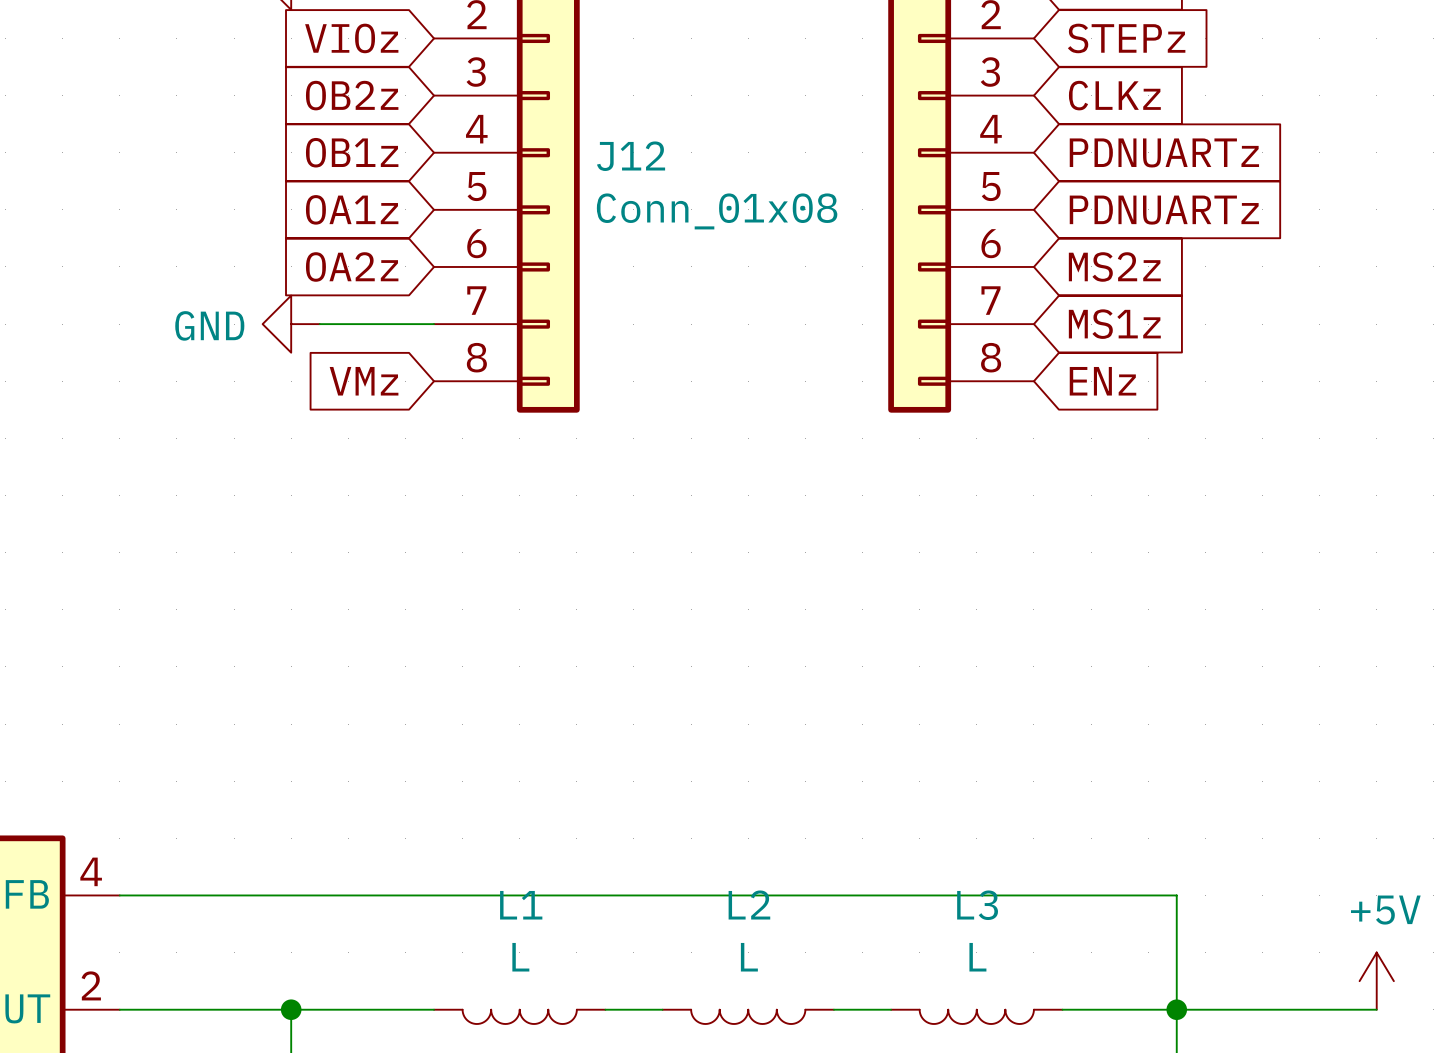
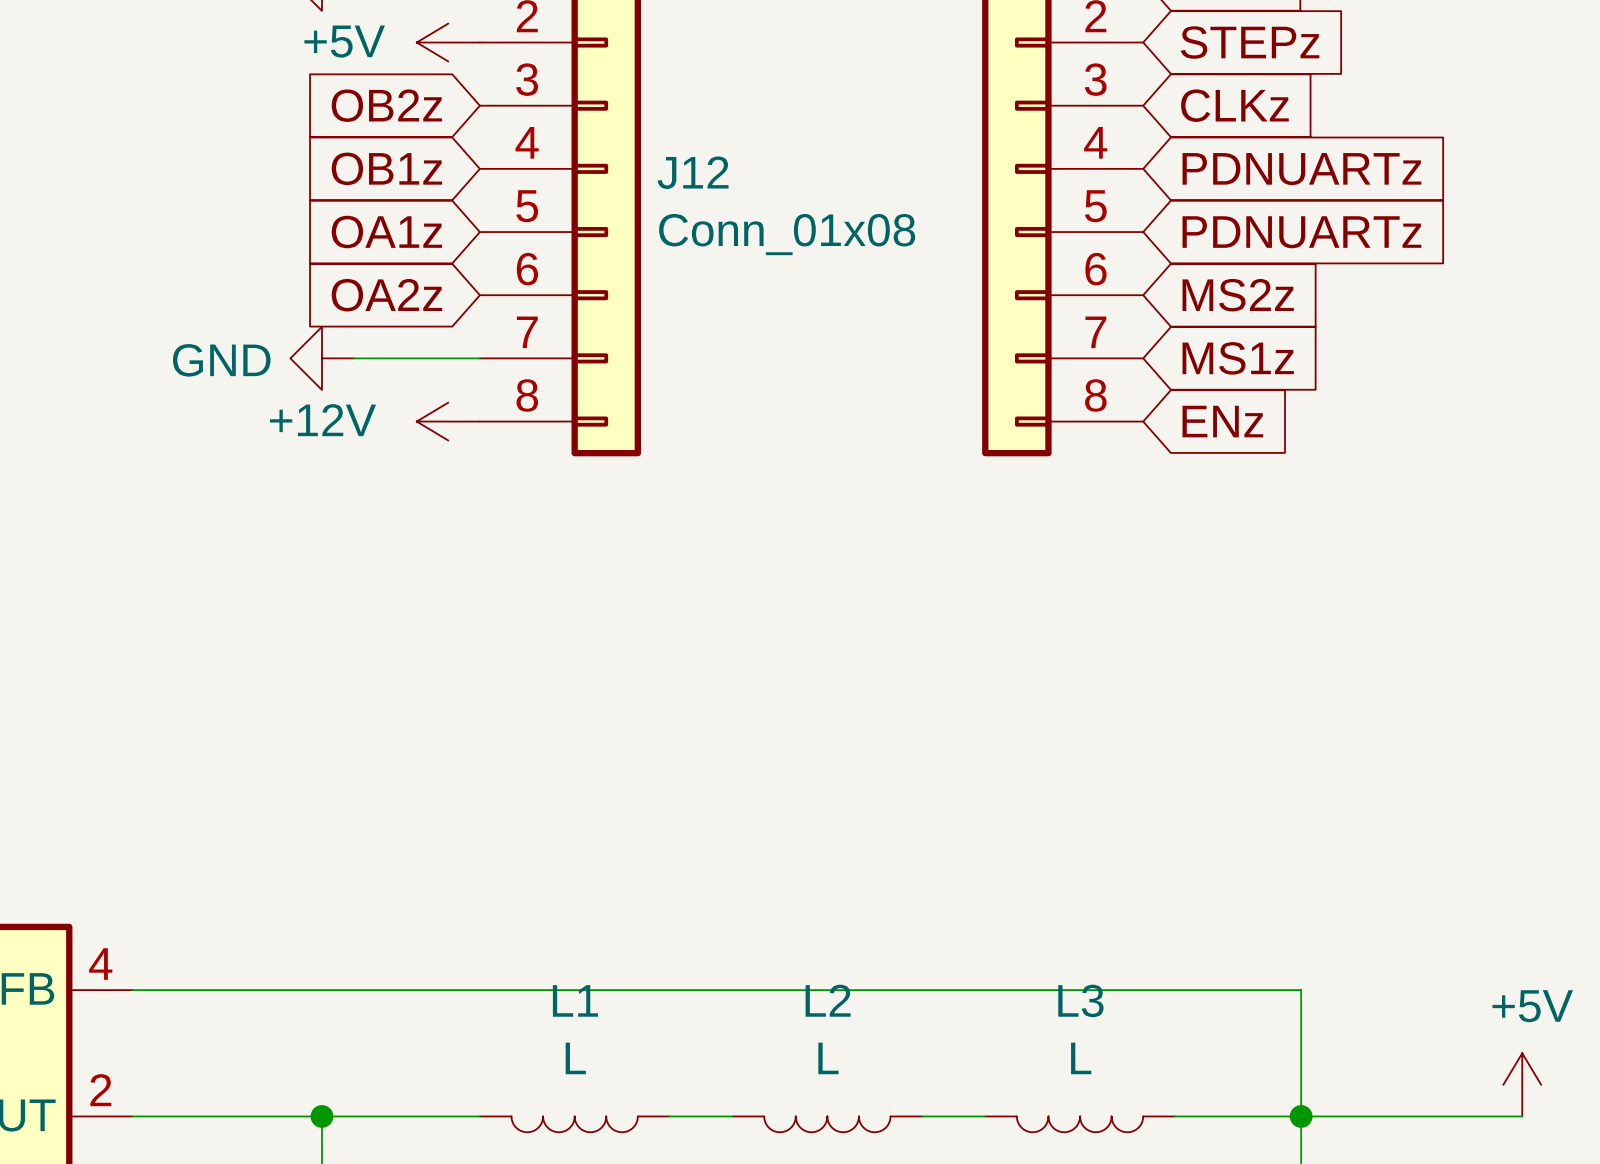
global label: VIOz (351, 38) -> none
power symbol: none -> +5V (448, 42)
global label: VMz (364, 381) -> none
power symbol: none -> +12V (448, 421)

